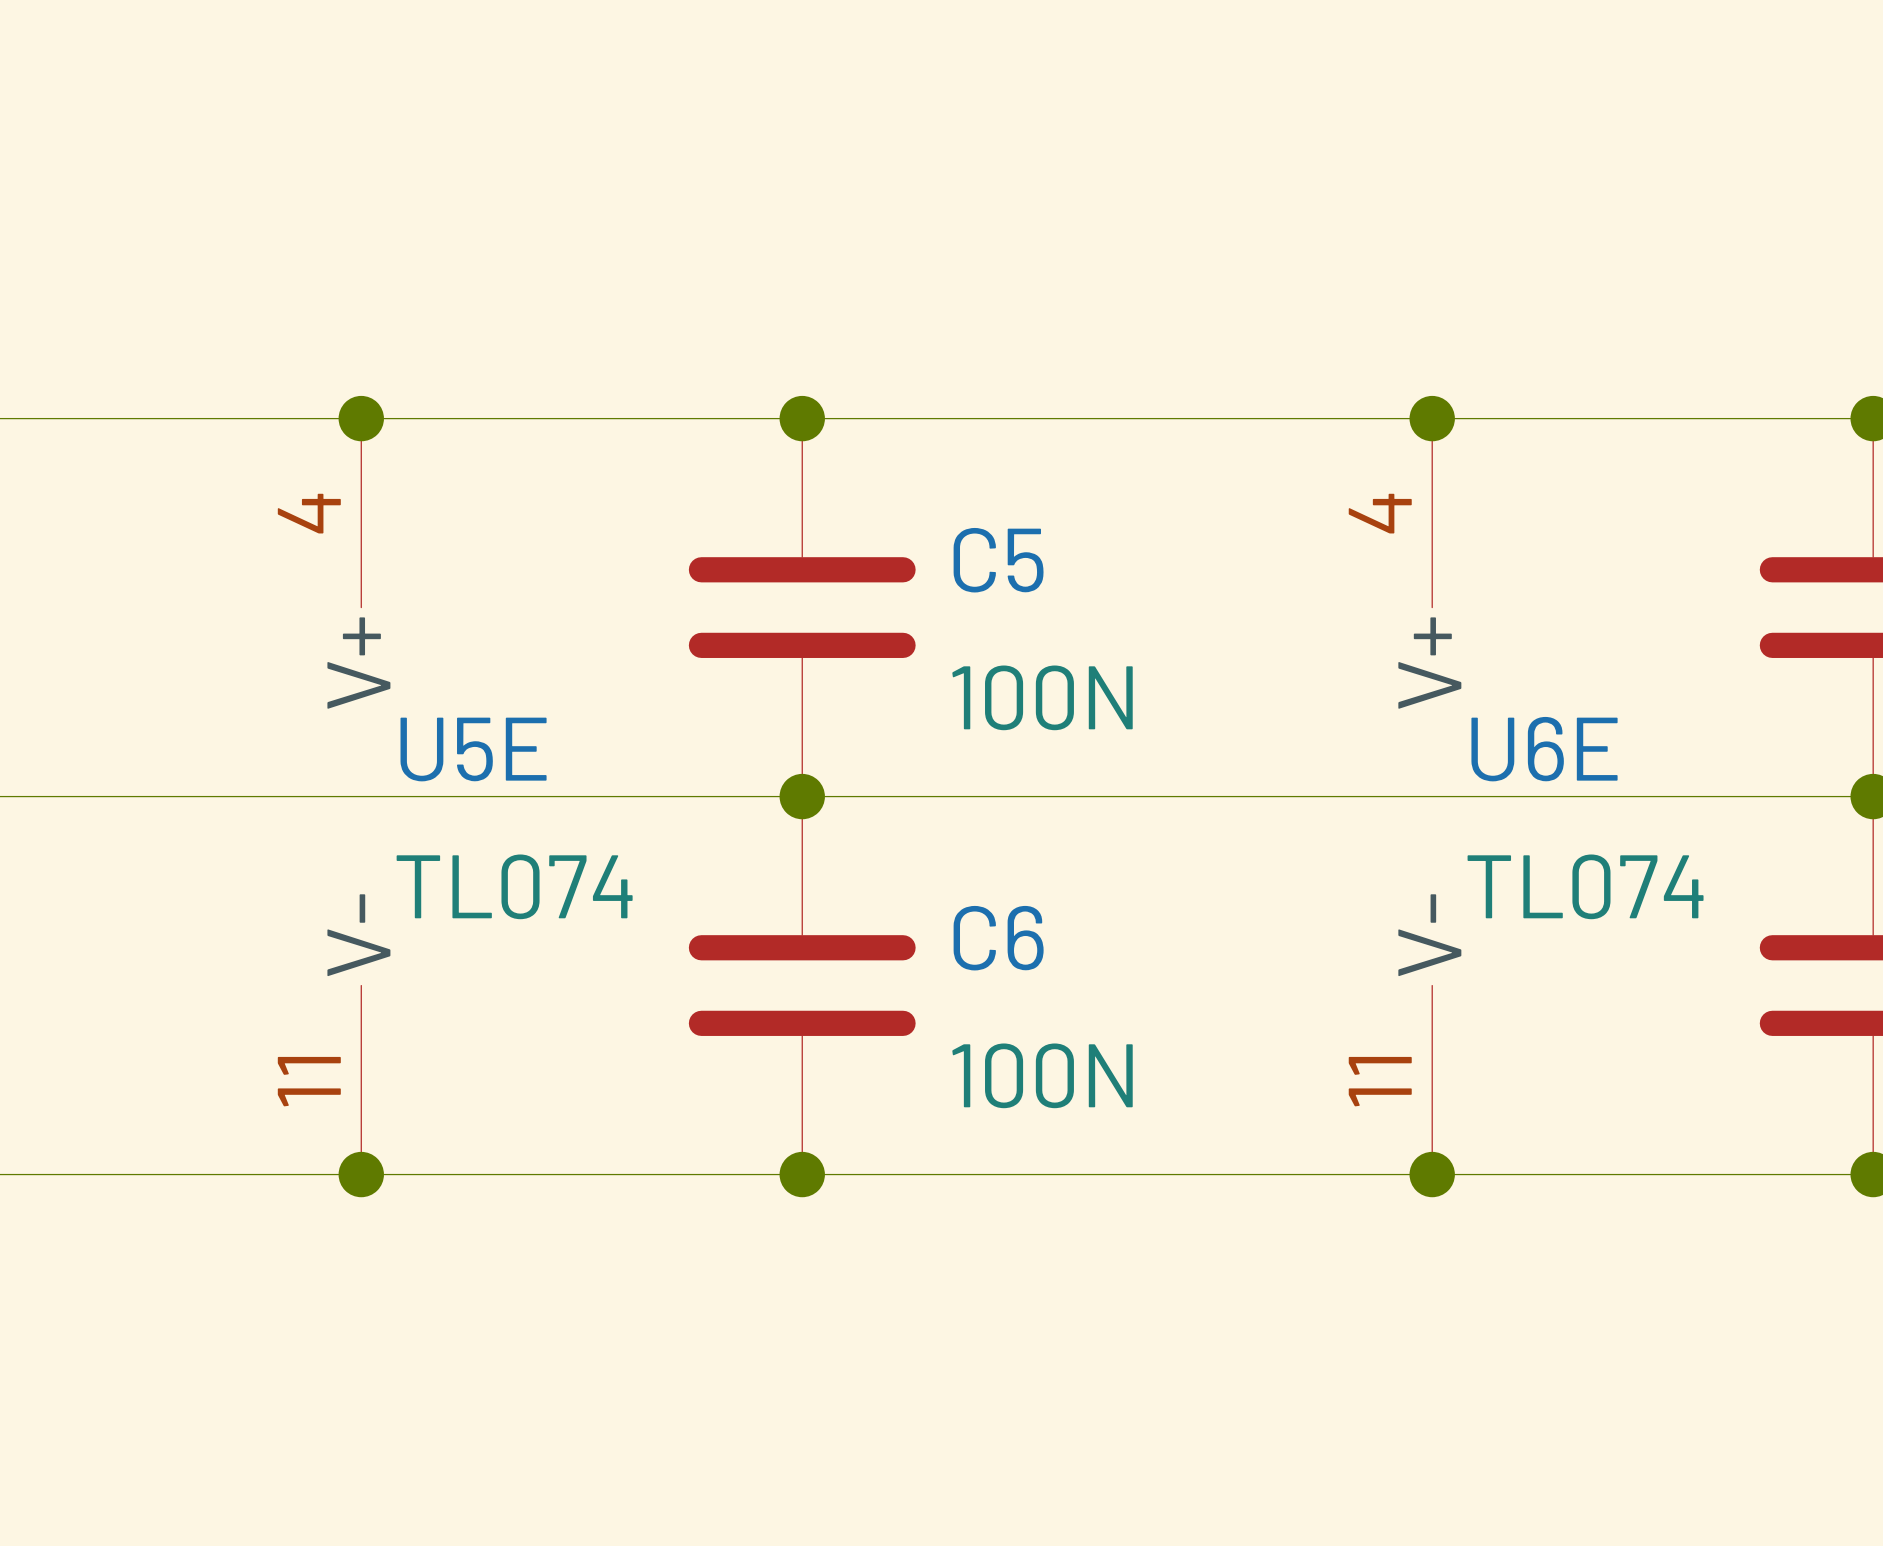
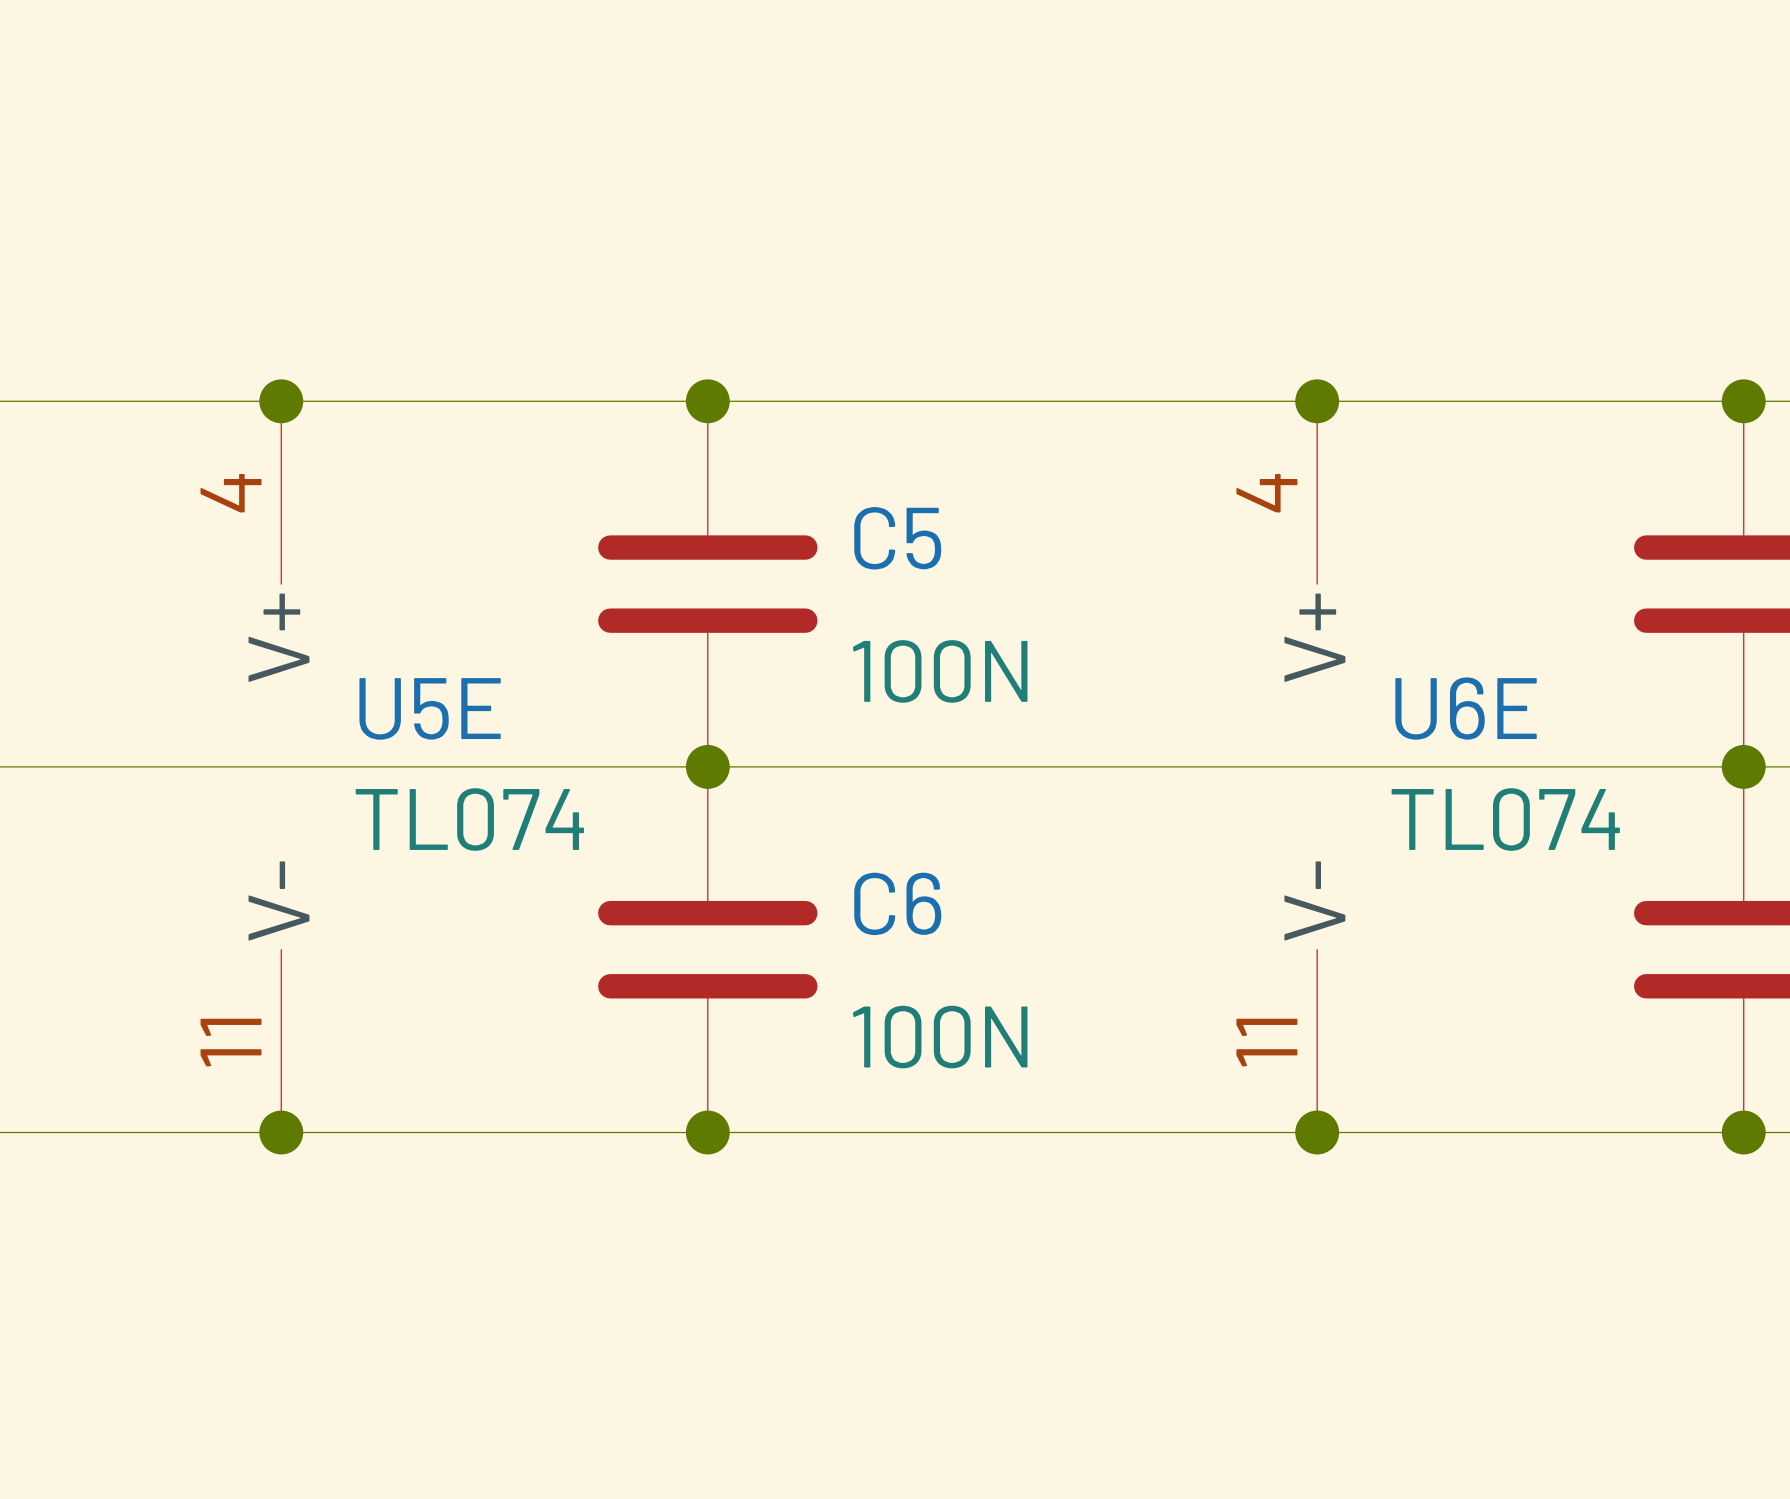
U5E name position: U5E (473, 749) -> U5E (430, 708)
U6E name position: U6E (1544, 749) -> U6E (1466, 708)
U5E value position: TL074 (514, 886) -> TL074 (469, 819)
U6E value position: TL074 (1585, 886) -> TL074 (1505, 819)

